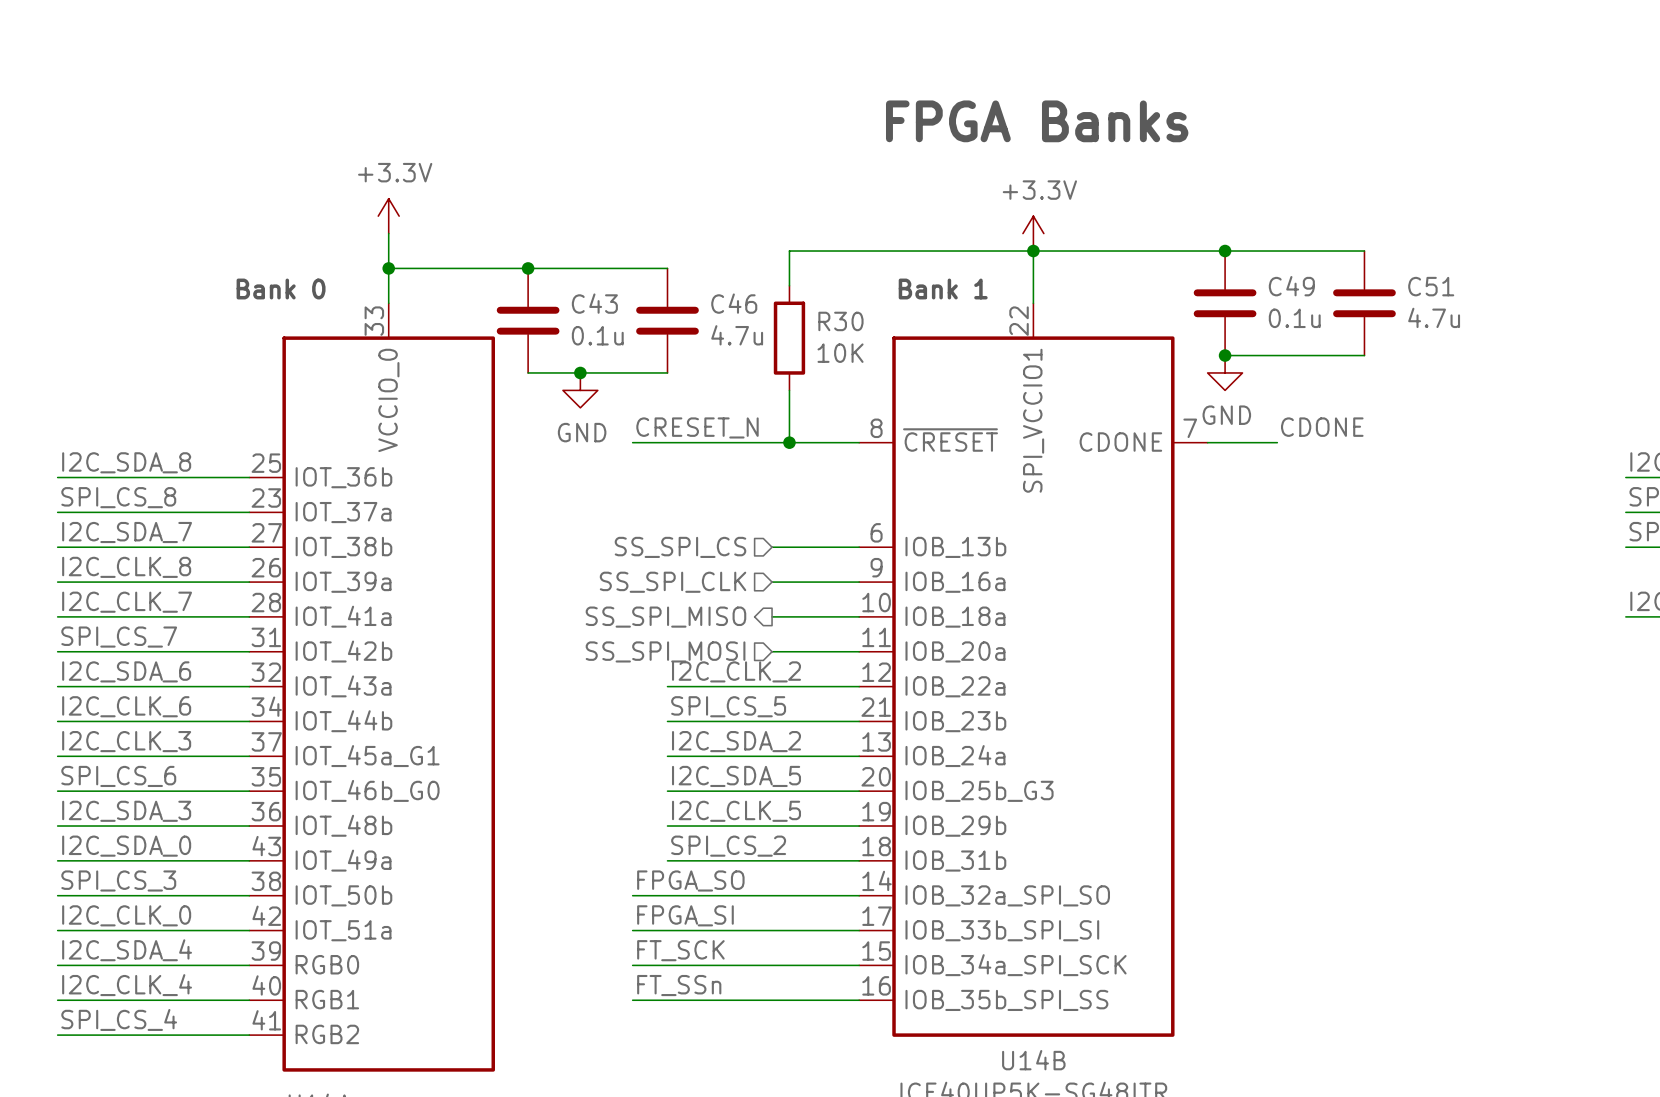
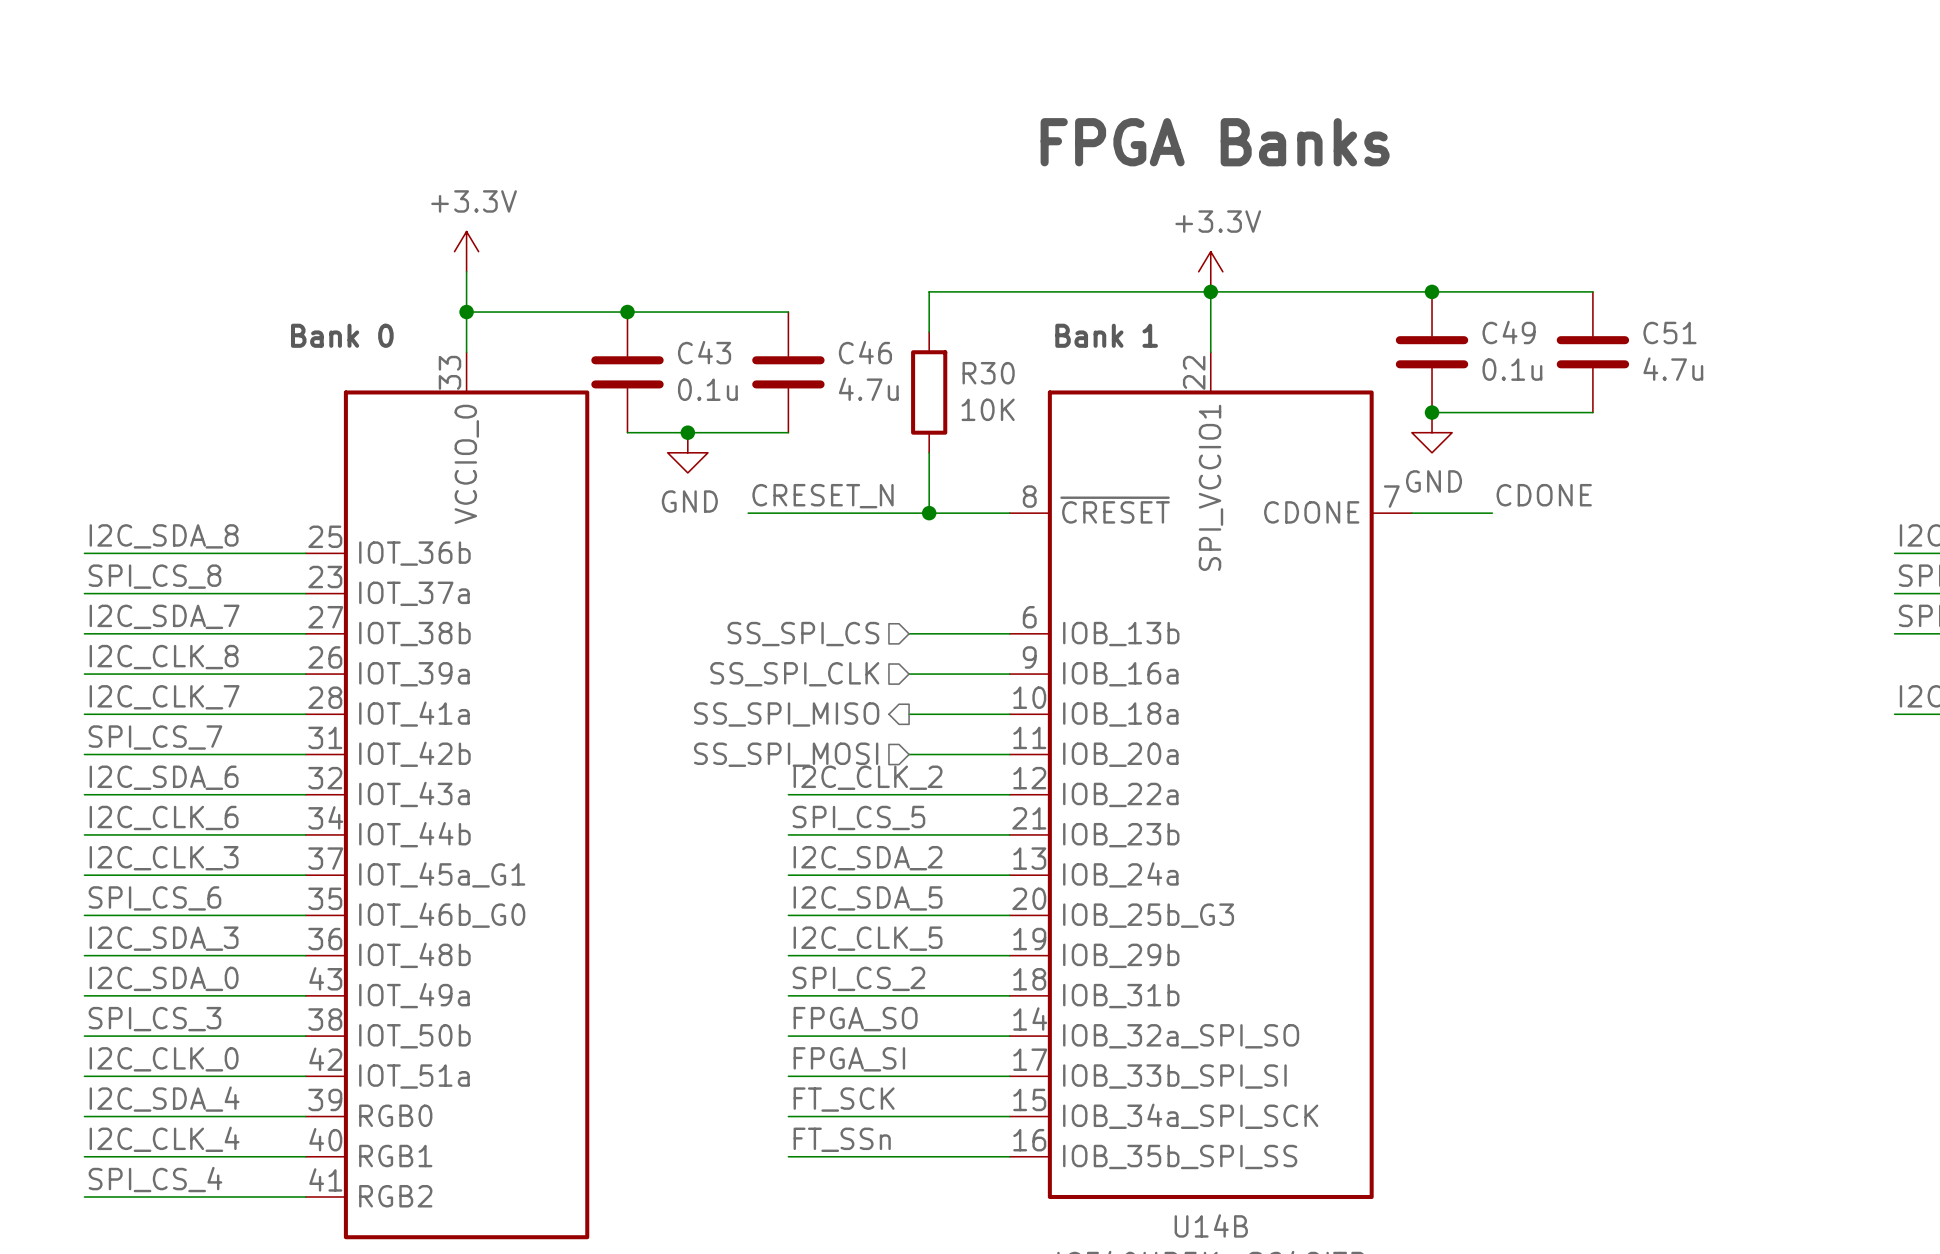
label position: FPGA_SO (690, 880) -> FPGA_SO (855, 1019)
wire: (632, 895) (667, 895) -> none
label position: FPGA_SI (685, 915) -> FPGA_SI (849, 1059)
wire: (632, 930) (667, 930) -> none
label position: FT_SCK (680, 950) -> FT_SCK (844, 1099)
wire: (632, 965) (667, 965) -> none
label position: FT_SSn (679, 985) -> FT_SSn (842, 1139)
wire: (632, 1000) (667, 1000) -> none

